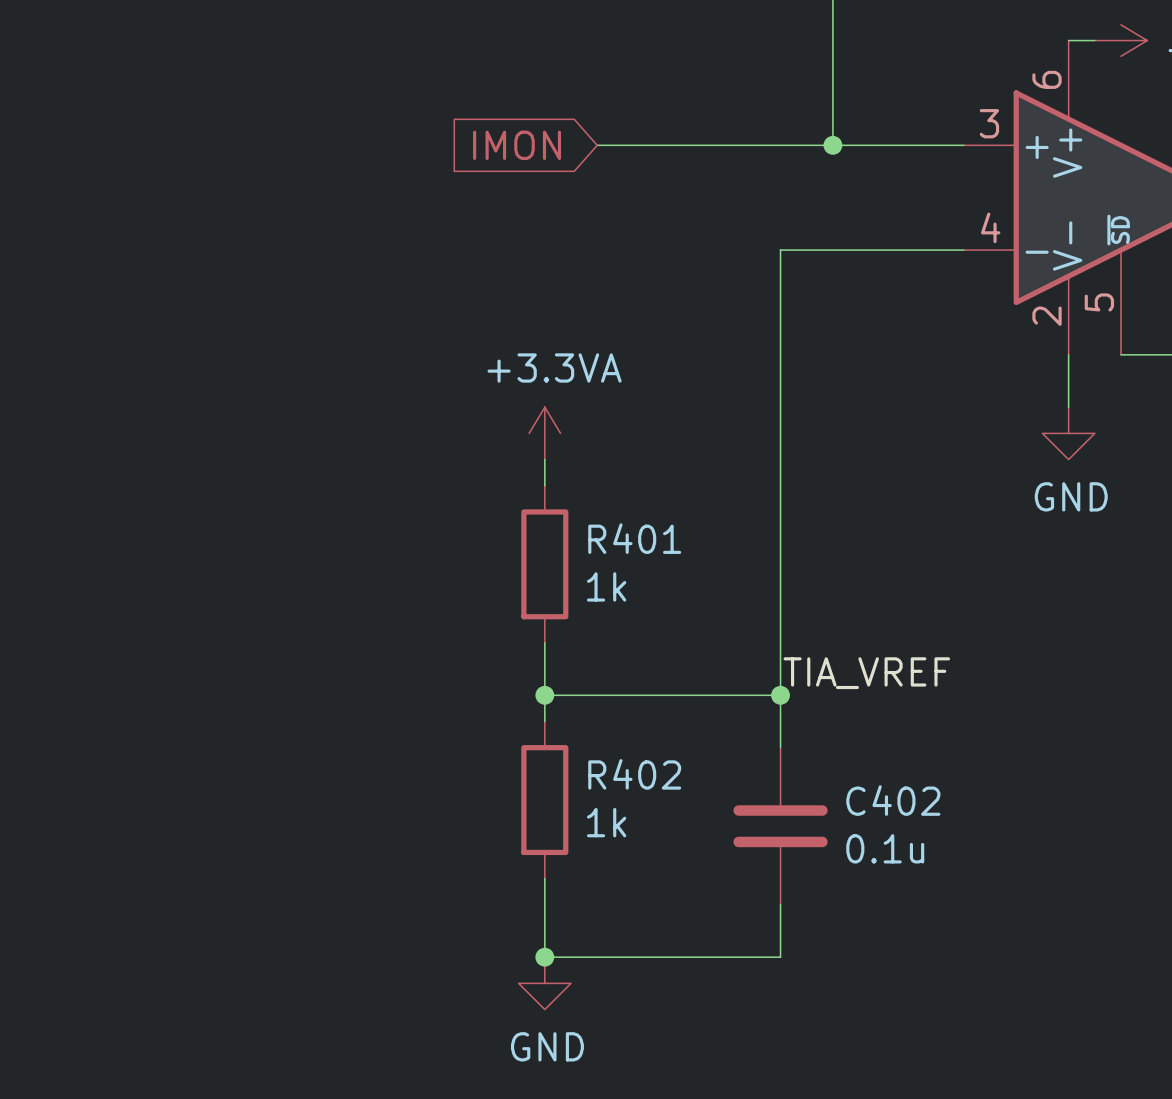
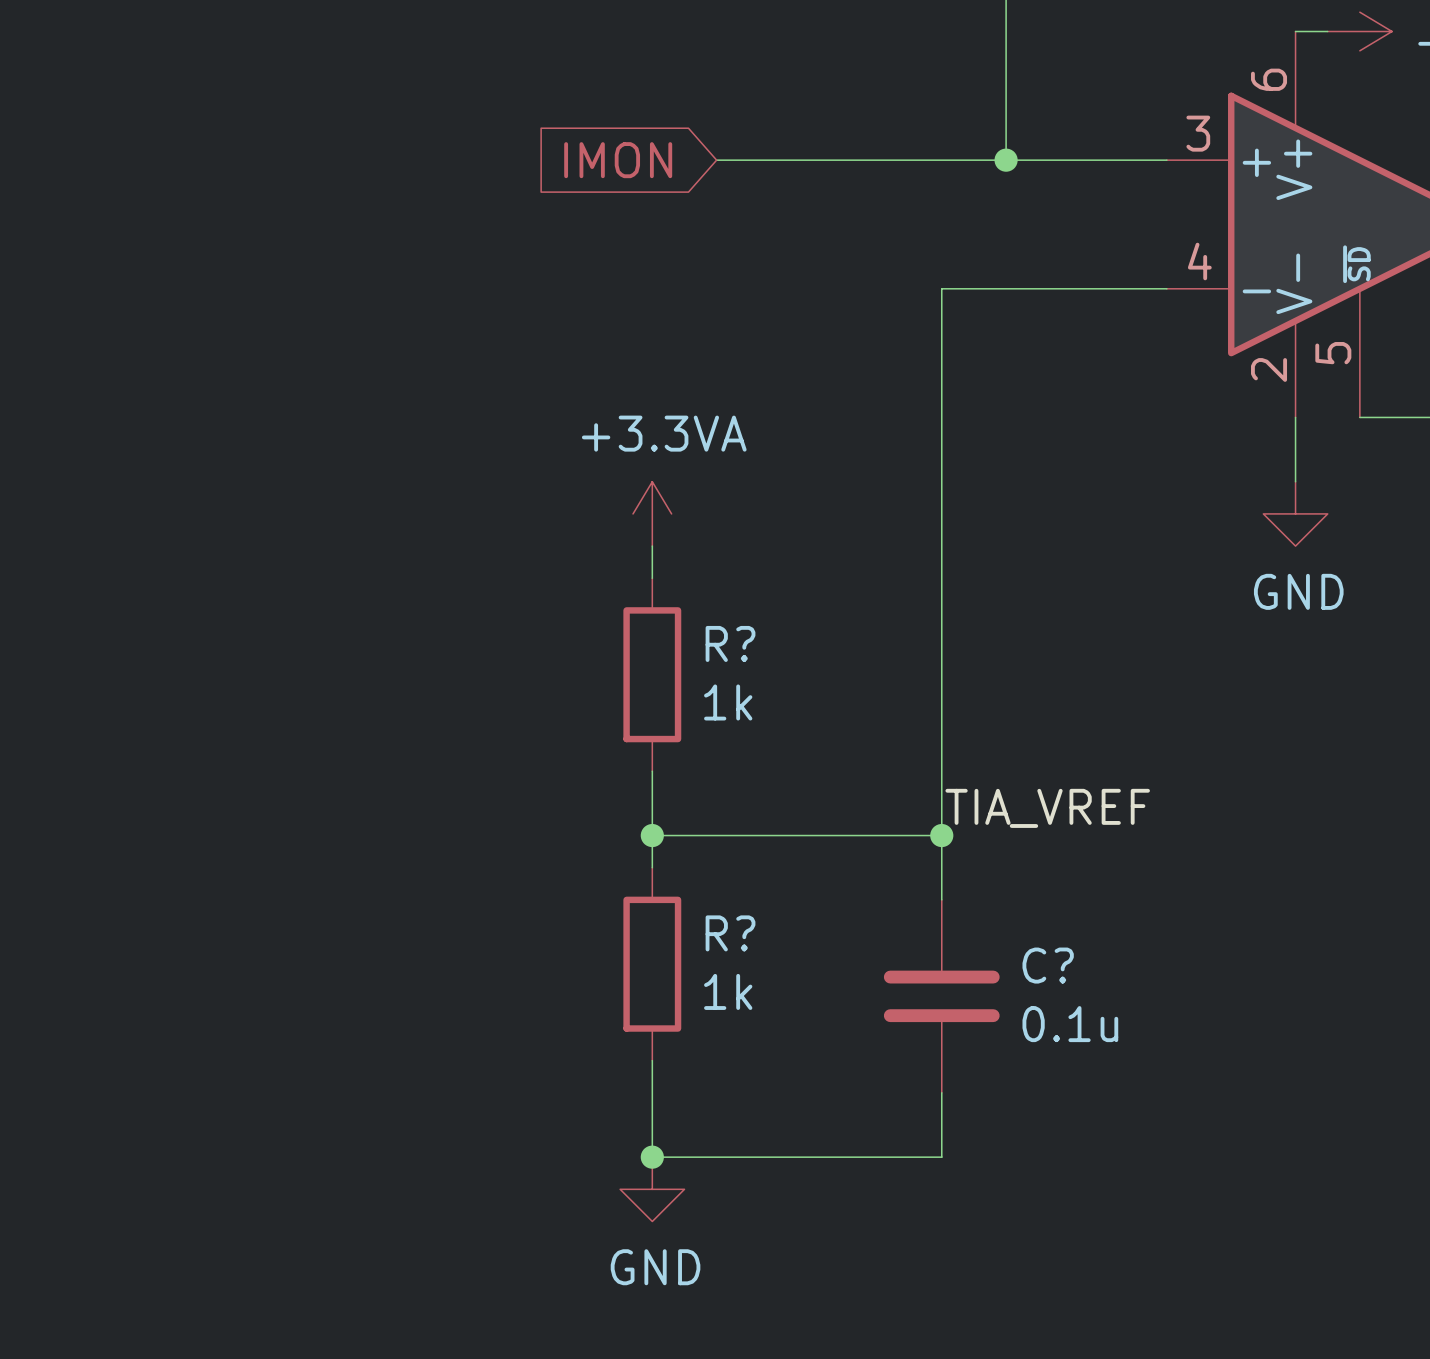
R401 name: R401 (634, 538) -> R? (730, 643)
R402 name: R402 (634, 774) -> R? (730, 933)
C402 name: C402 (893, 800) -> C? (1048, 965)

